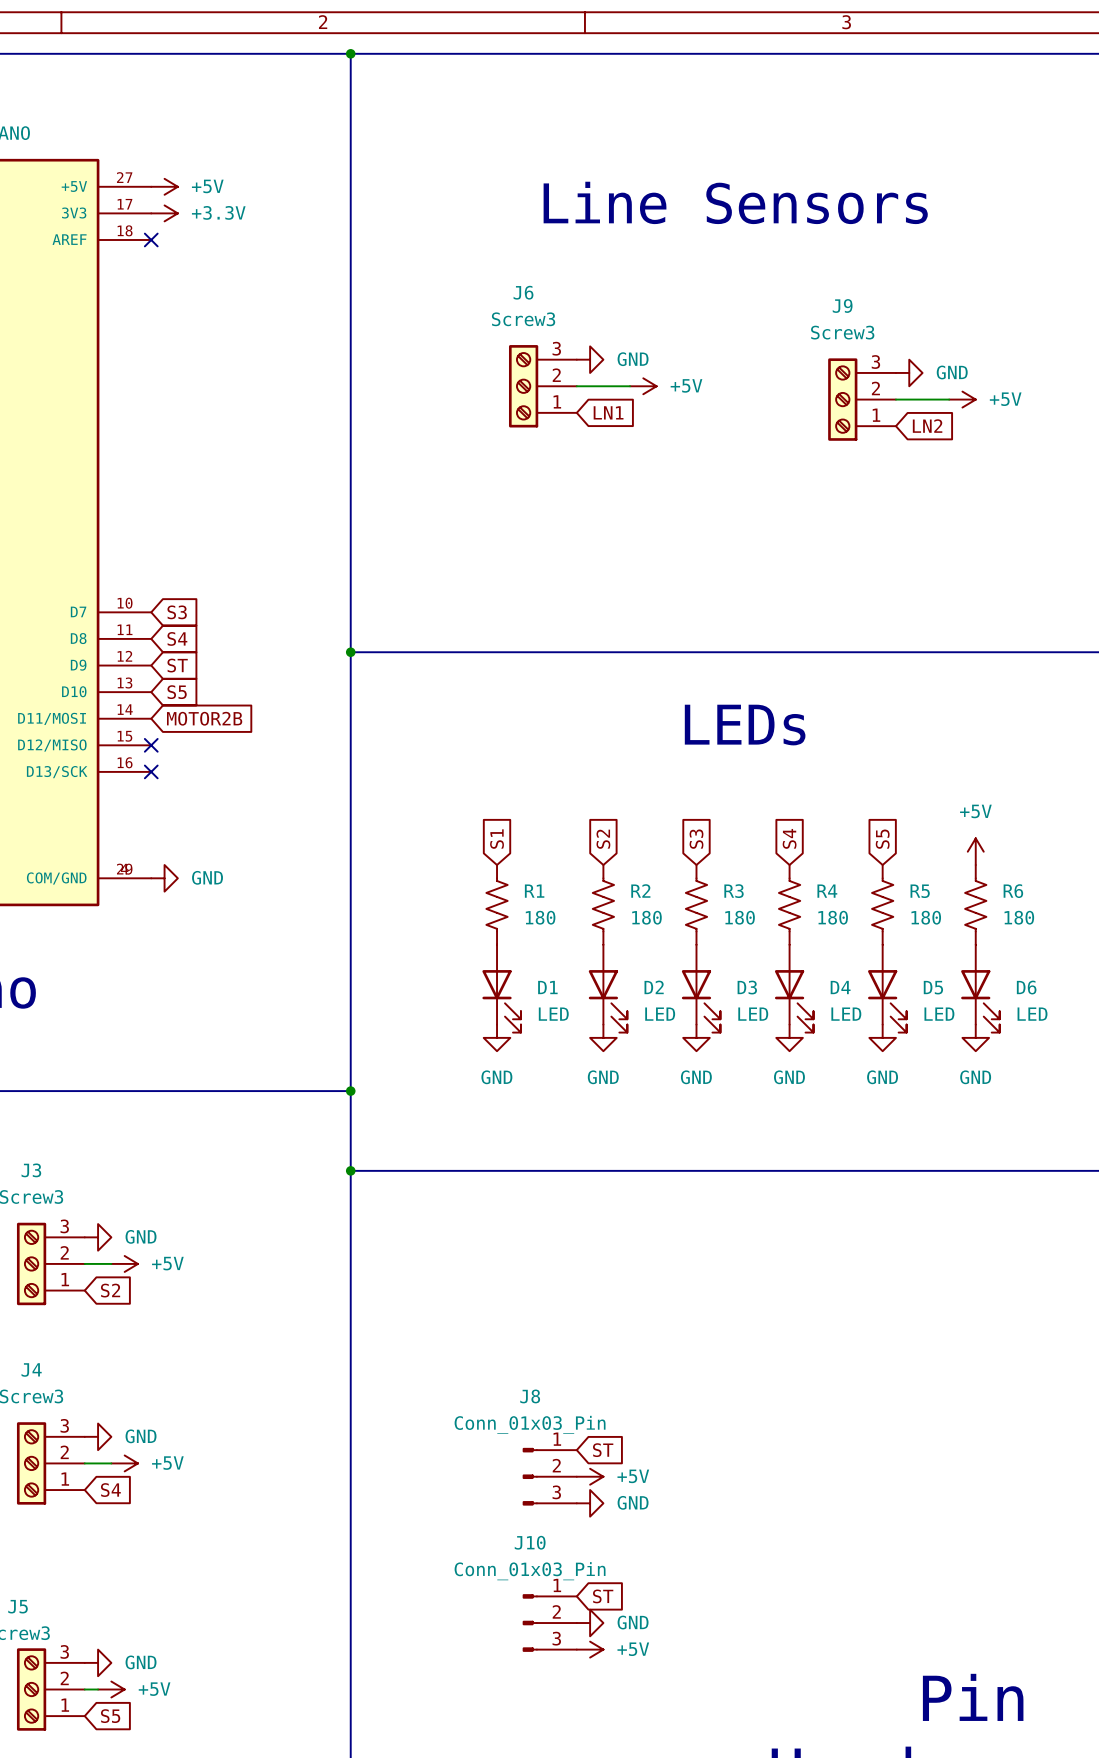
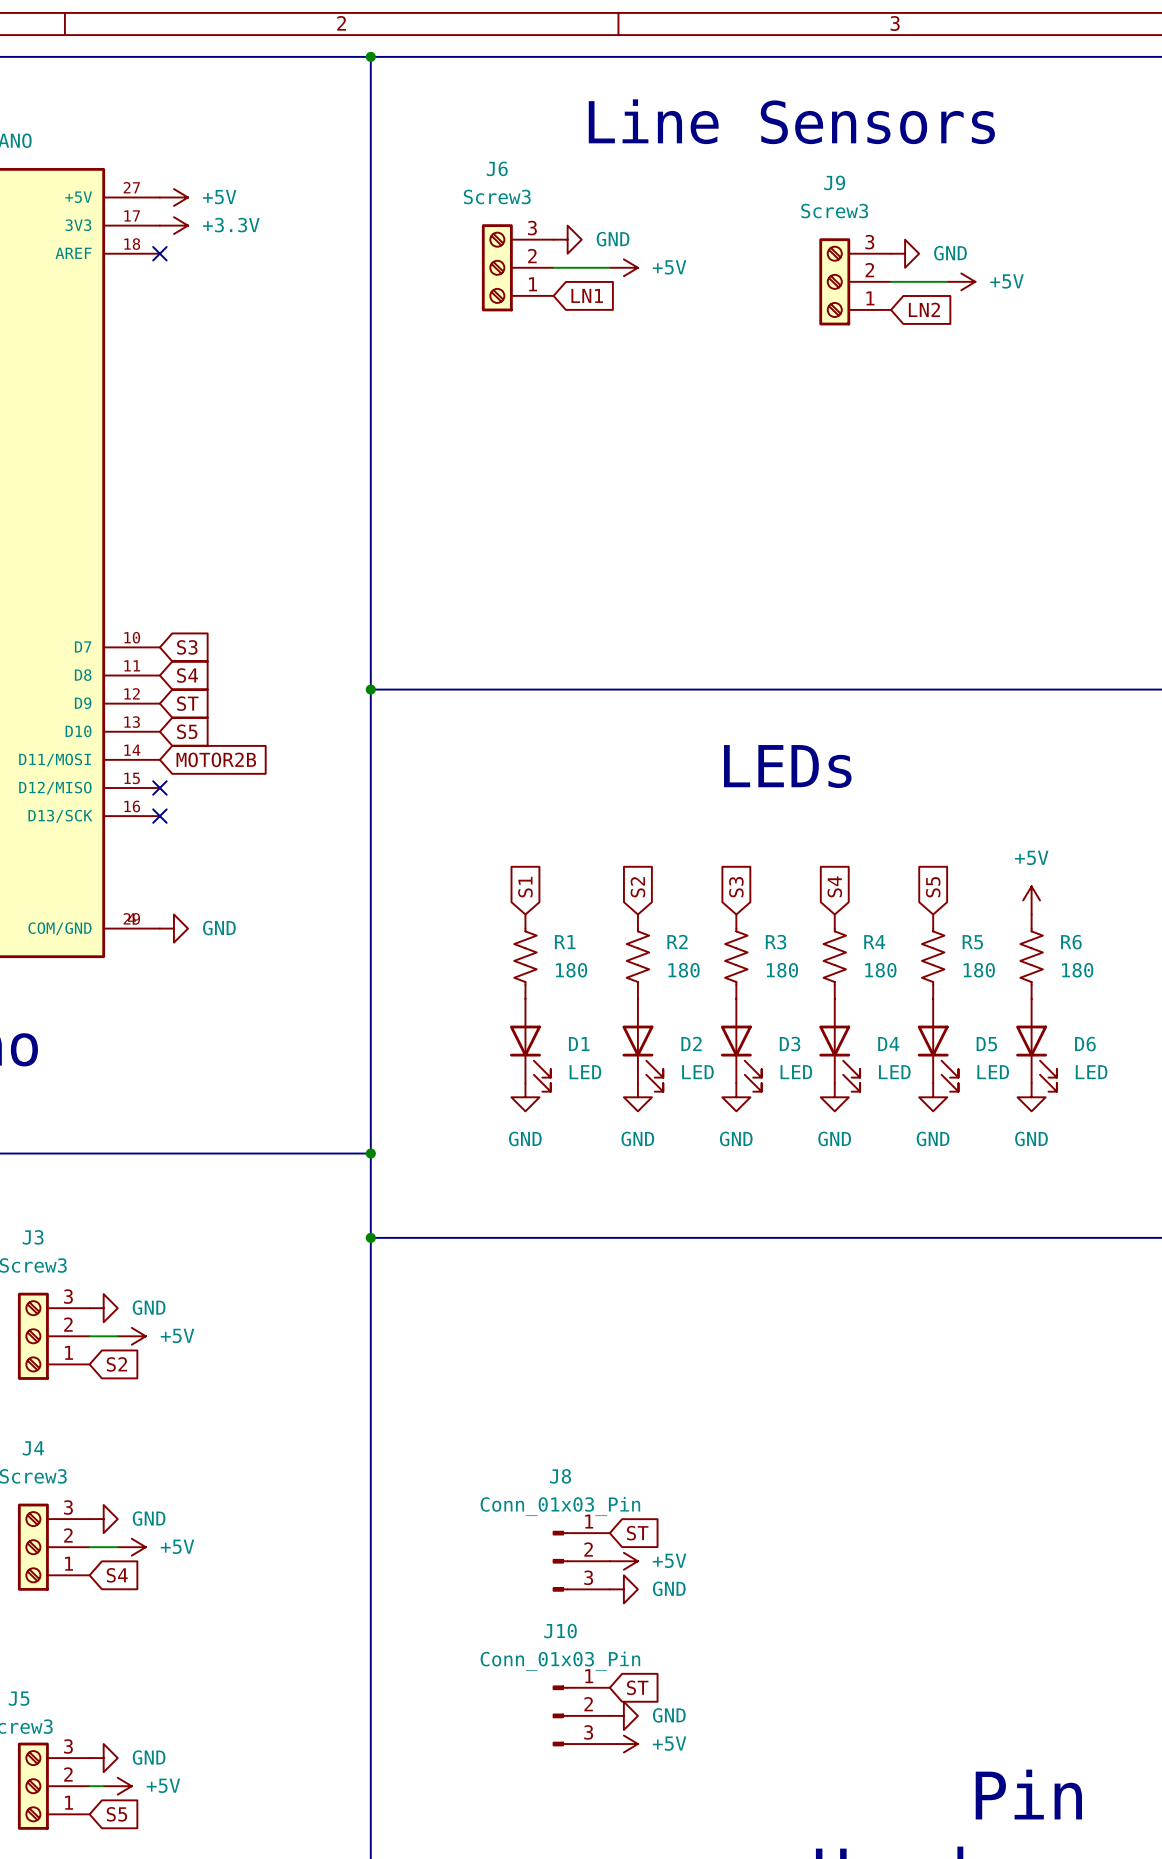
text position: Line Sensors (735, 202) -> Line Sensors (791, 121)
power symbol position: GND (590, 359) -> GND (567, 239)
power symbol position: GND (909, 372) -> GND (905, 253)
J6 position: (542, 386) -> (517, 267)
wire: (576, 386) (630, 386) -> (553, 267) (609, 267)
power symbol position: +5V (643, 386) -> +5V (623, 267)
J9 position: (862, 399) -> (855, 281)
wire: (895, 399) (949, 399) -> (891, 281) (947, 281)
power symbol position: +5V (962, 399) -> +5V (961, 281)
global label position: LN1 (608, 412) -> LN1 (587, 295)
global label position: LN2 (927, 426) -> LN2 (924, 309)

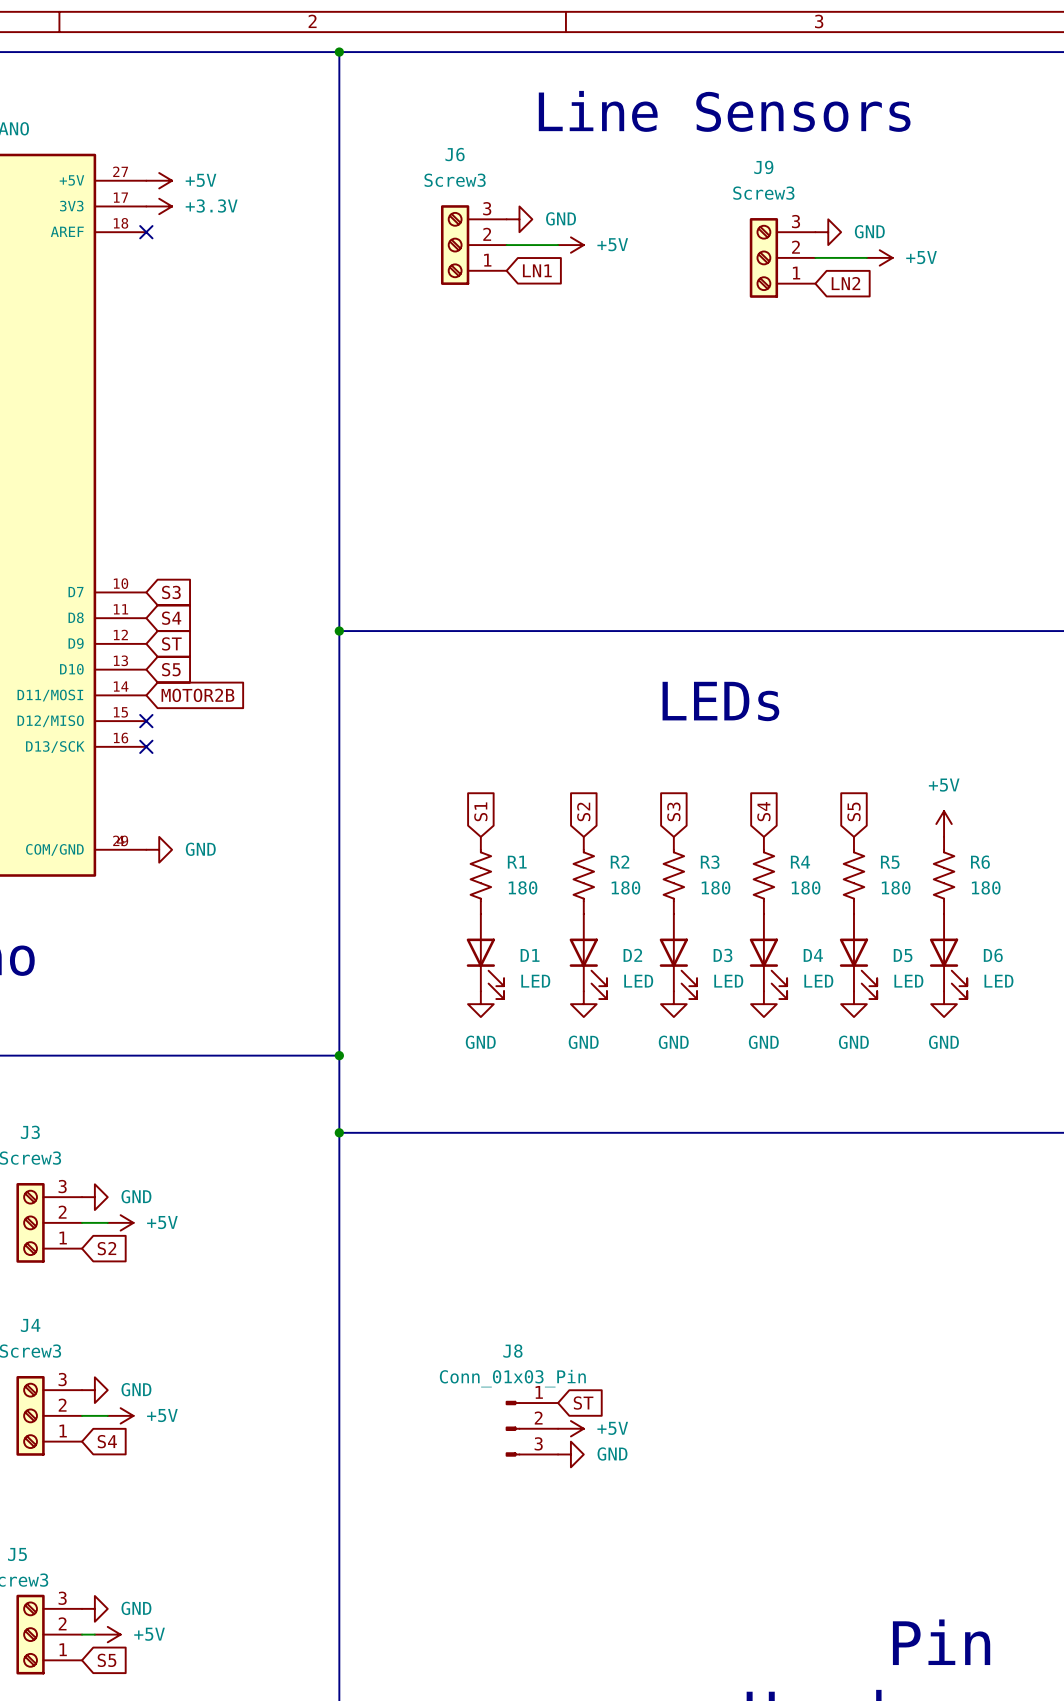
global label: ST (637, 1687) -> none
J10: Conn_01x03_Pin (581, 1715) -> none
power symbol: GND (623, 1715) -> none
power symbol: +5V (623, 1744) -> none

